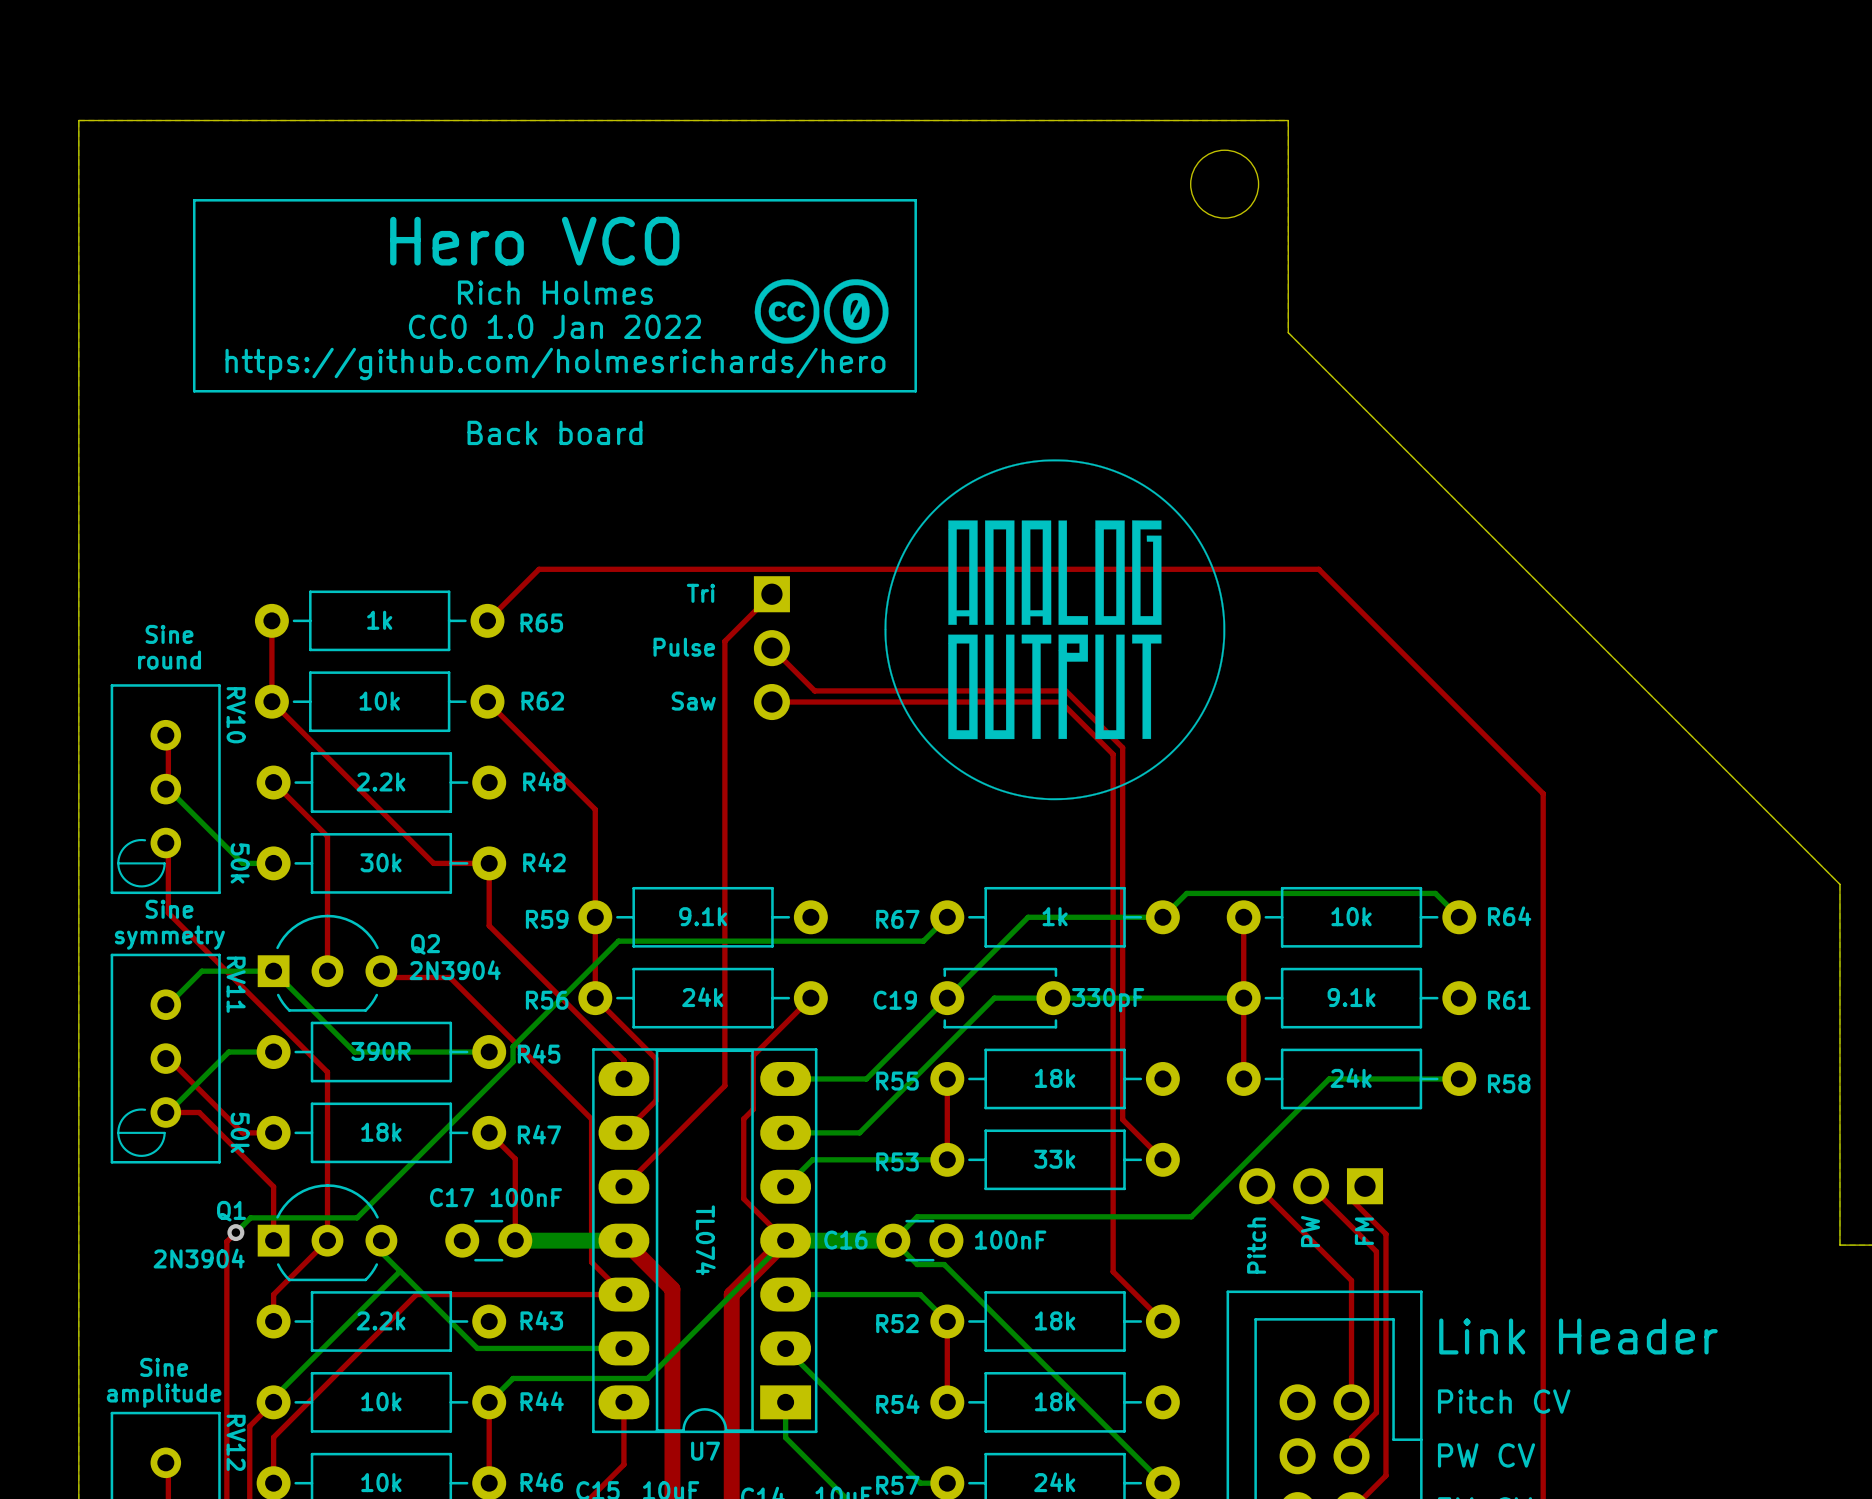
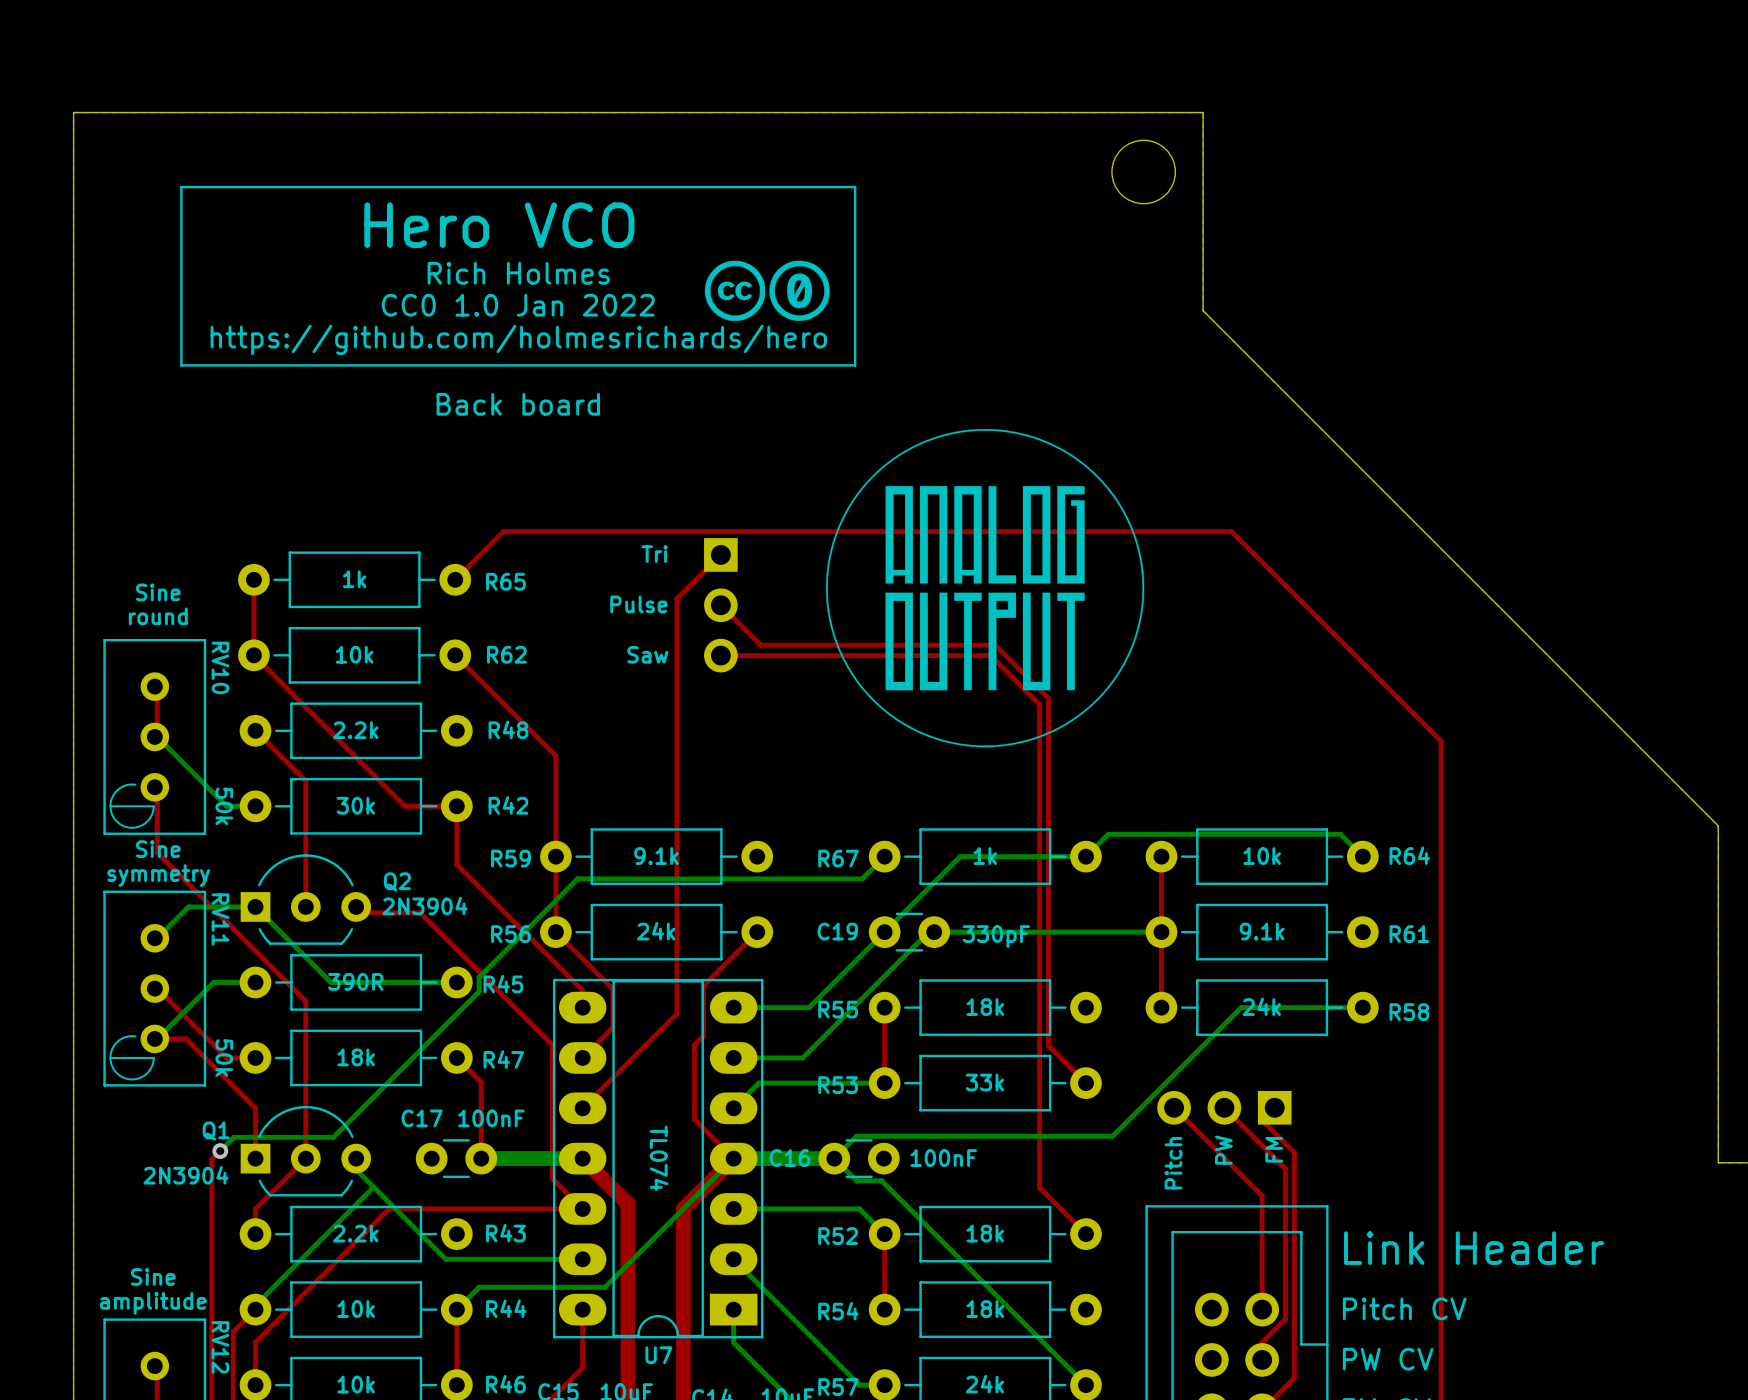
C19 footprint: [930, 967, 1071, 1029] -> [868, 912, 951, 952]

